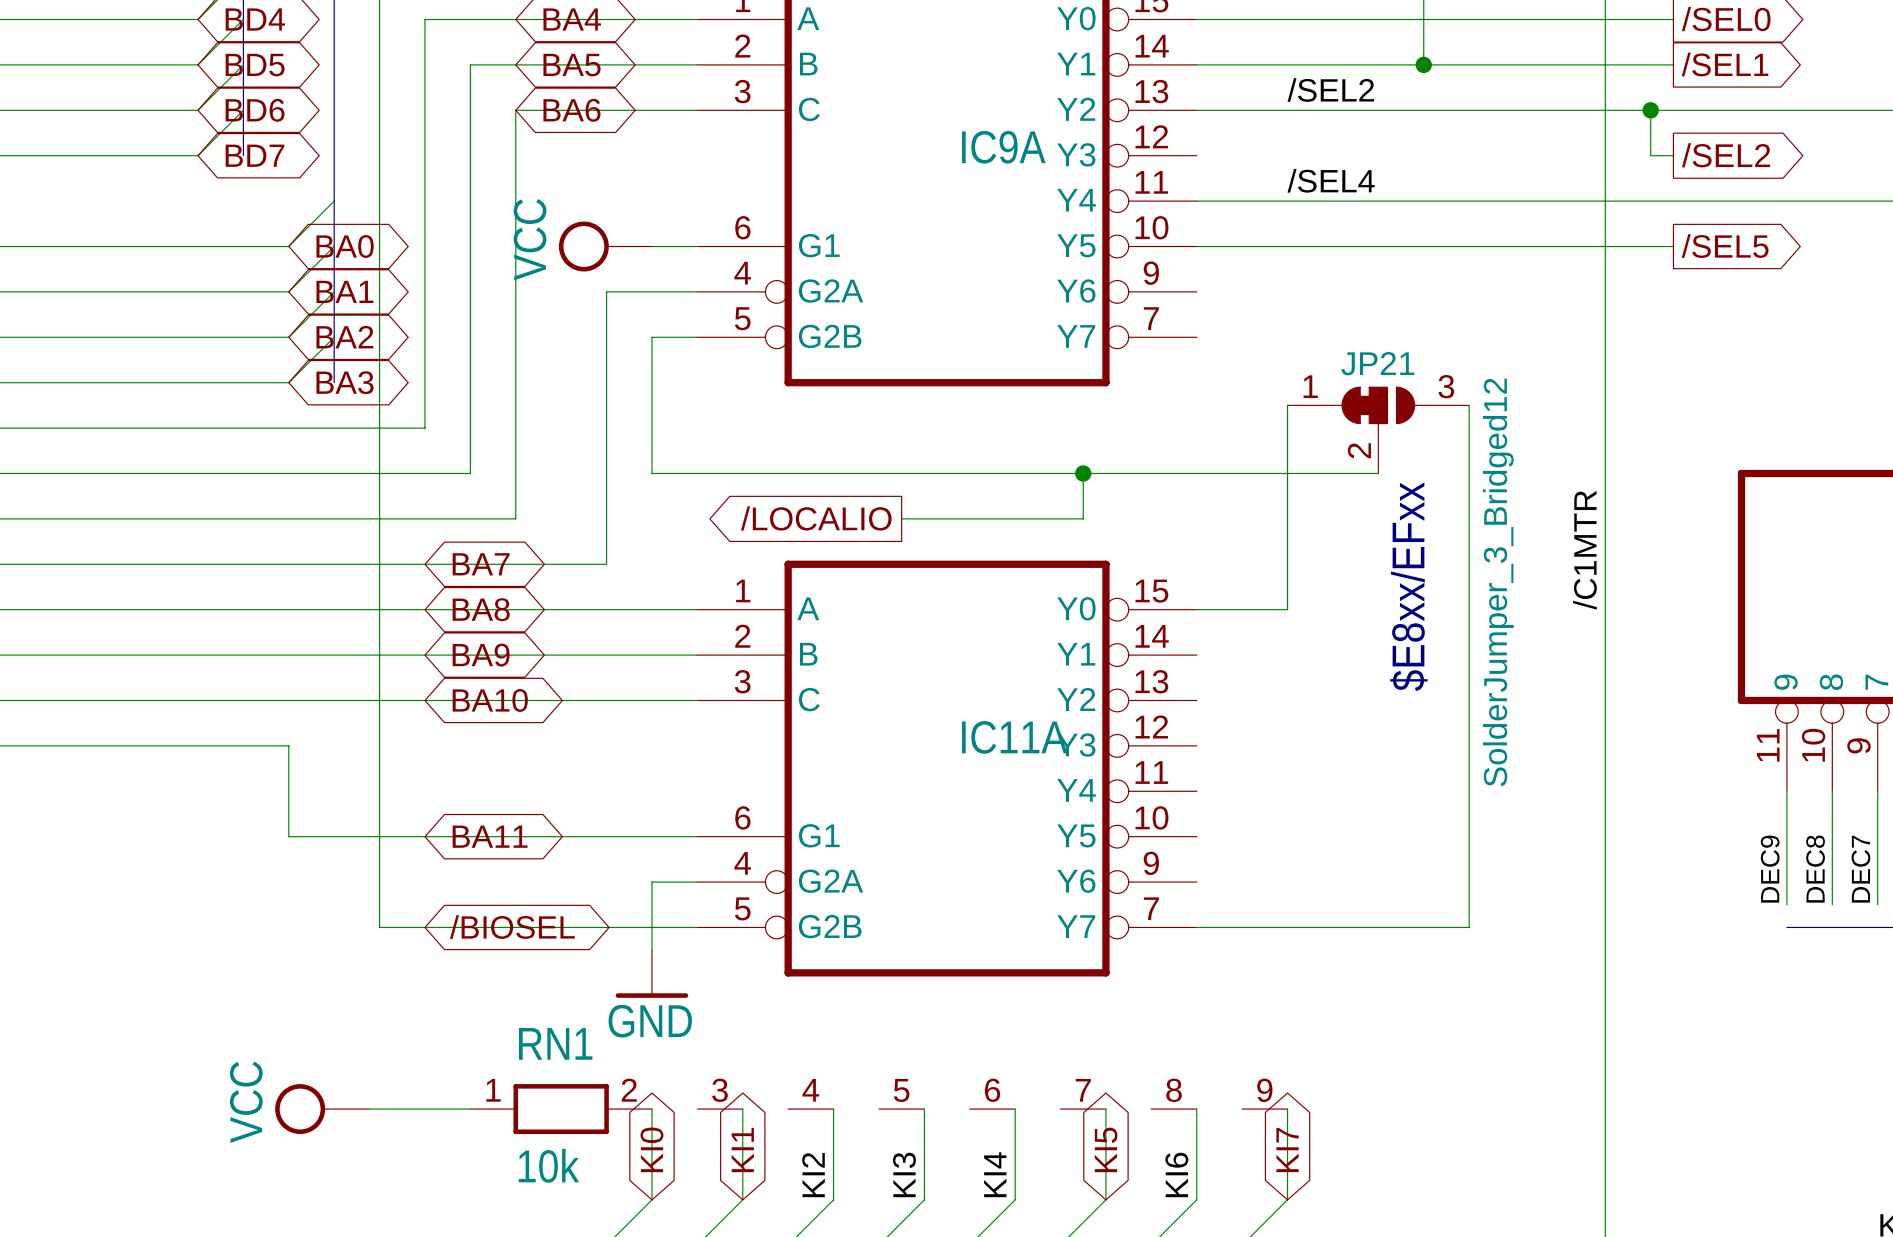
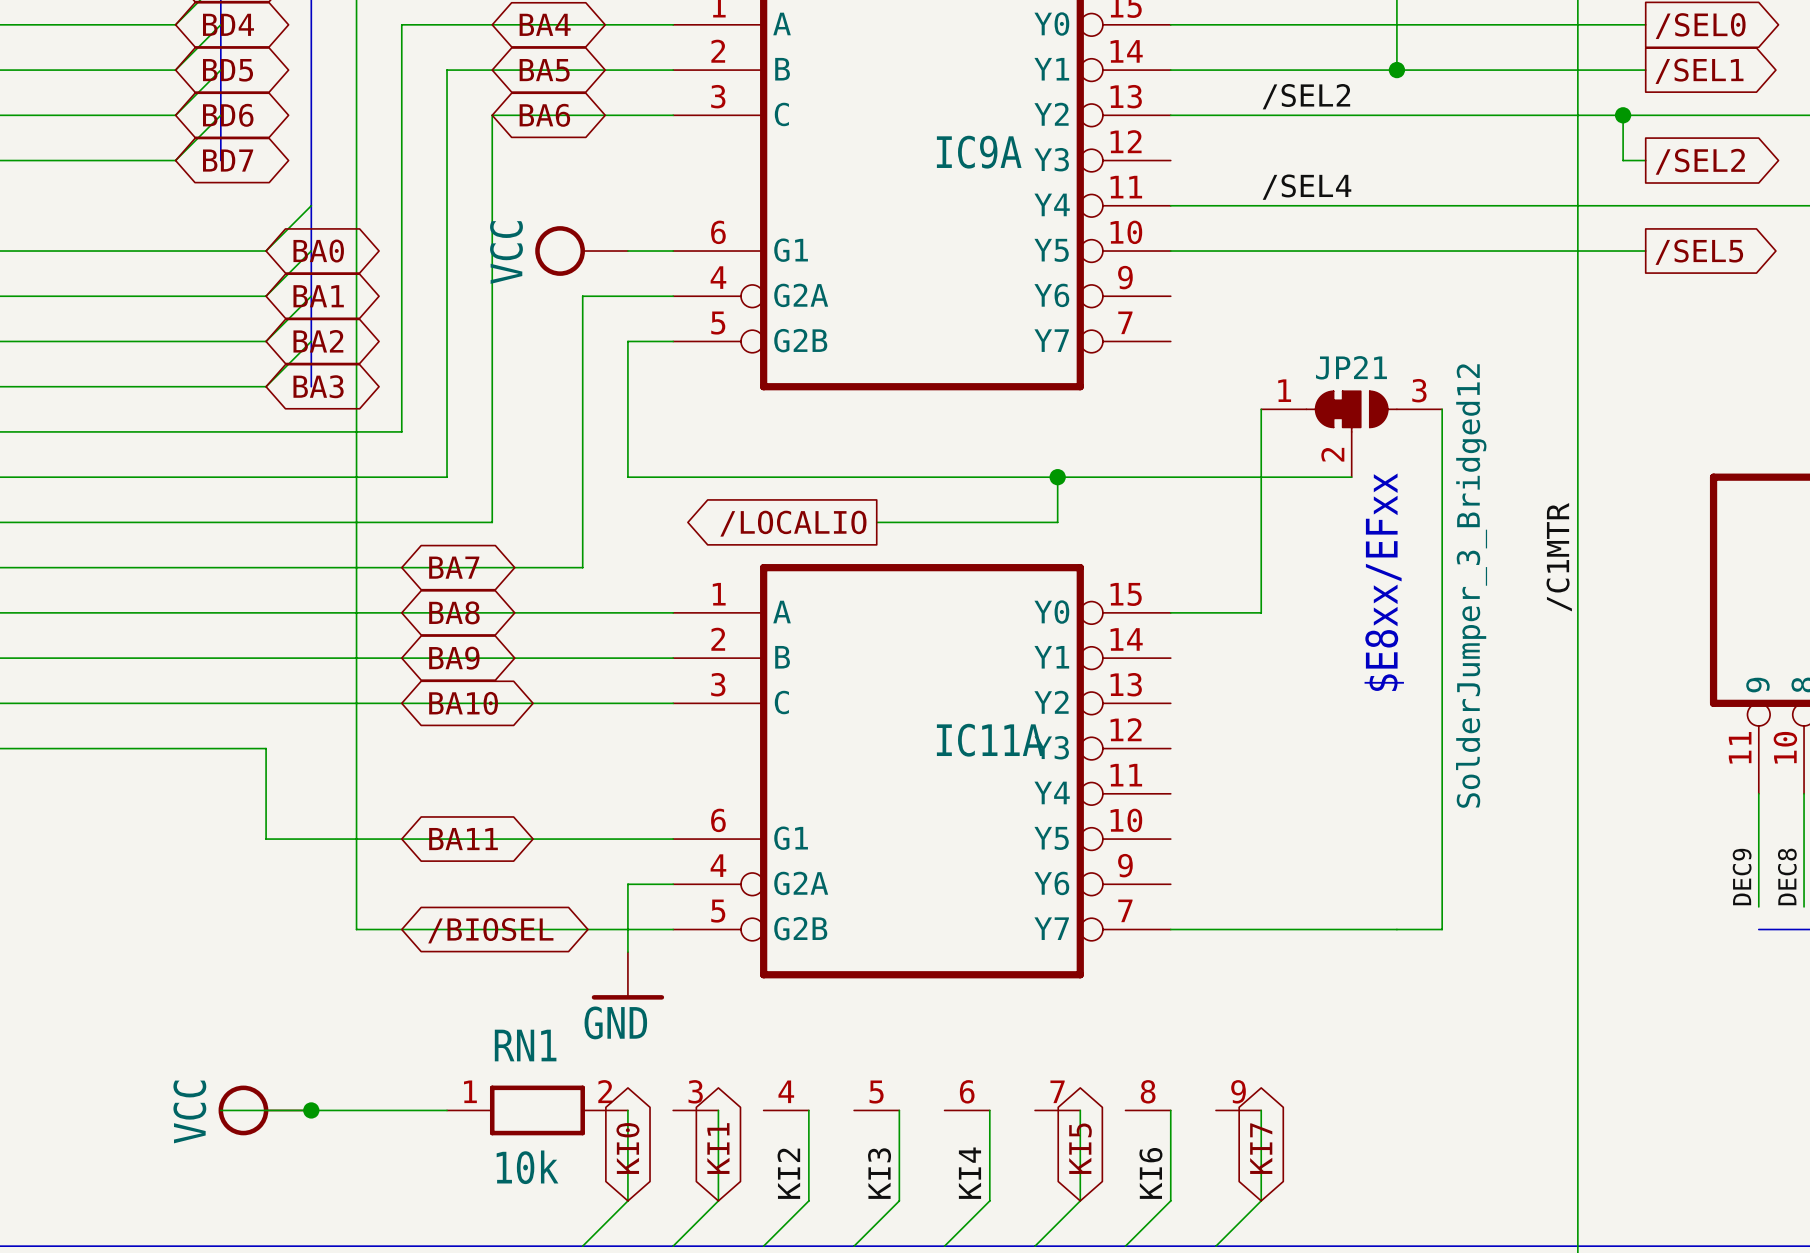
wire: none -> (220, 1110) (345, 1110)
power symbol position: VCC (321, 1109) -> VCC (264, 1110)
junction: none -> (311, 1110)

